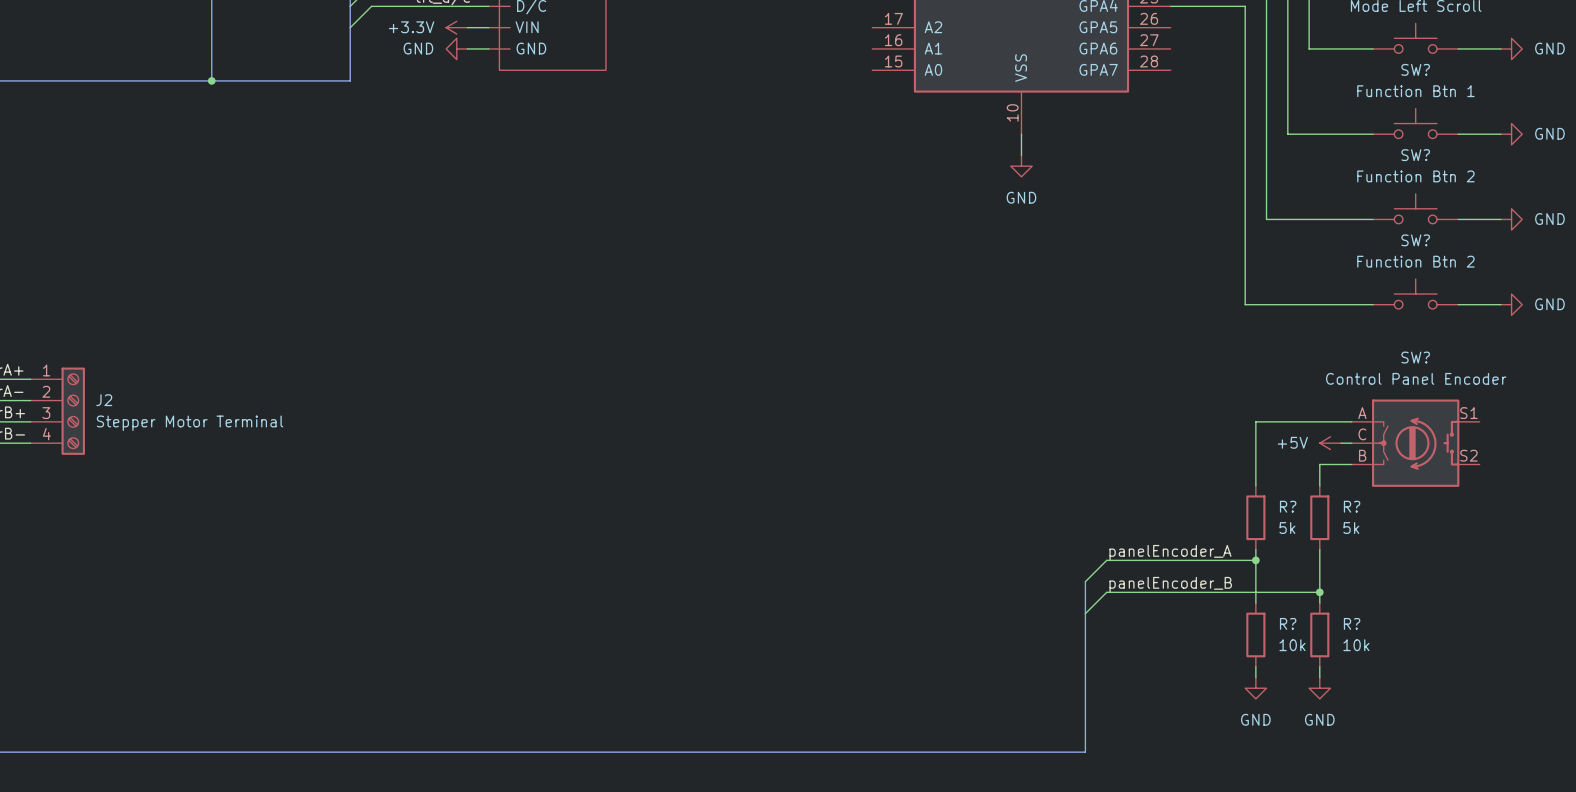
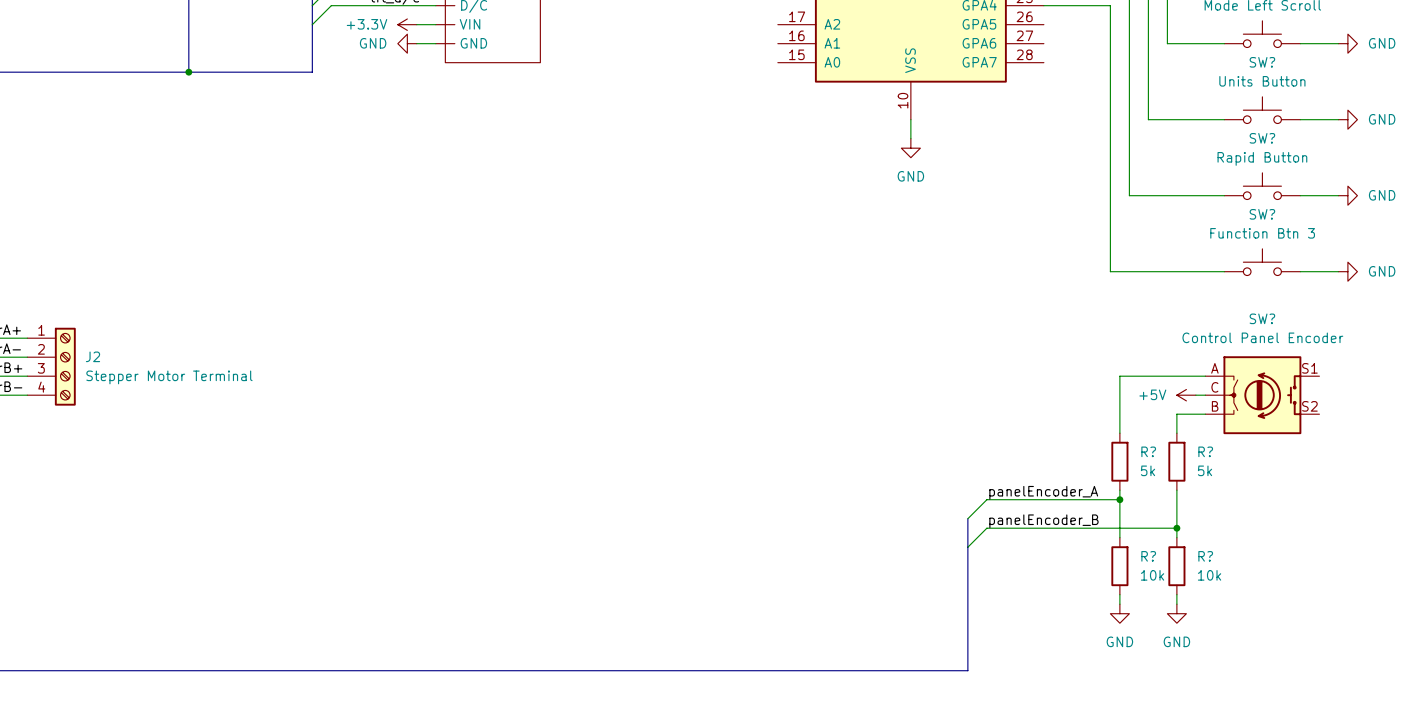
SW? value: Function Btn 1 (1415, 91) -> Units Button (1262, 81)
SW? value: Function Btn 2 (1415, 176) -> Rapid Button (1262, 158)
SW? value: Function Btn 2 (1415, 261) -> Function Btn 3 (1262, 233)

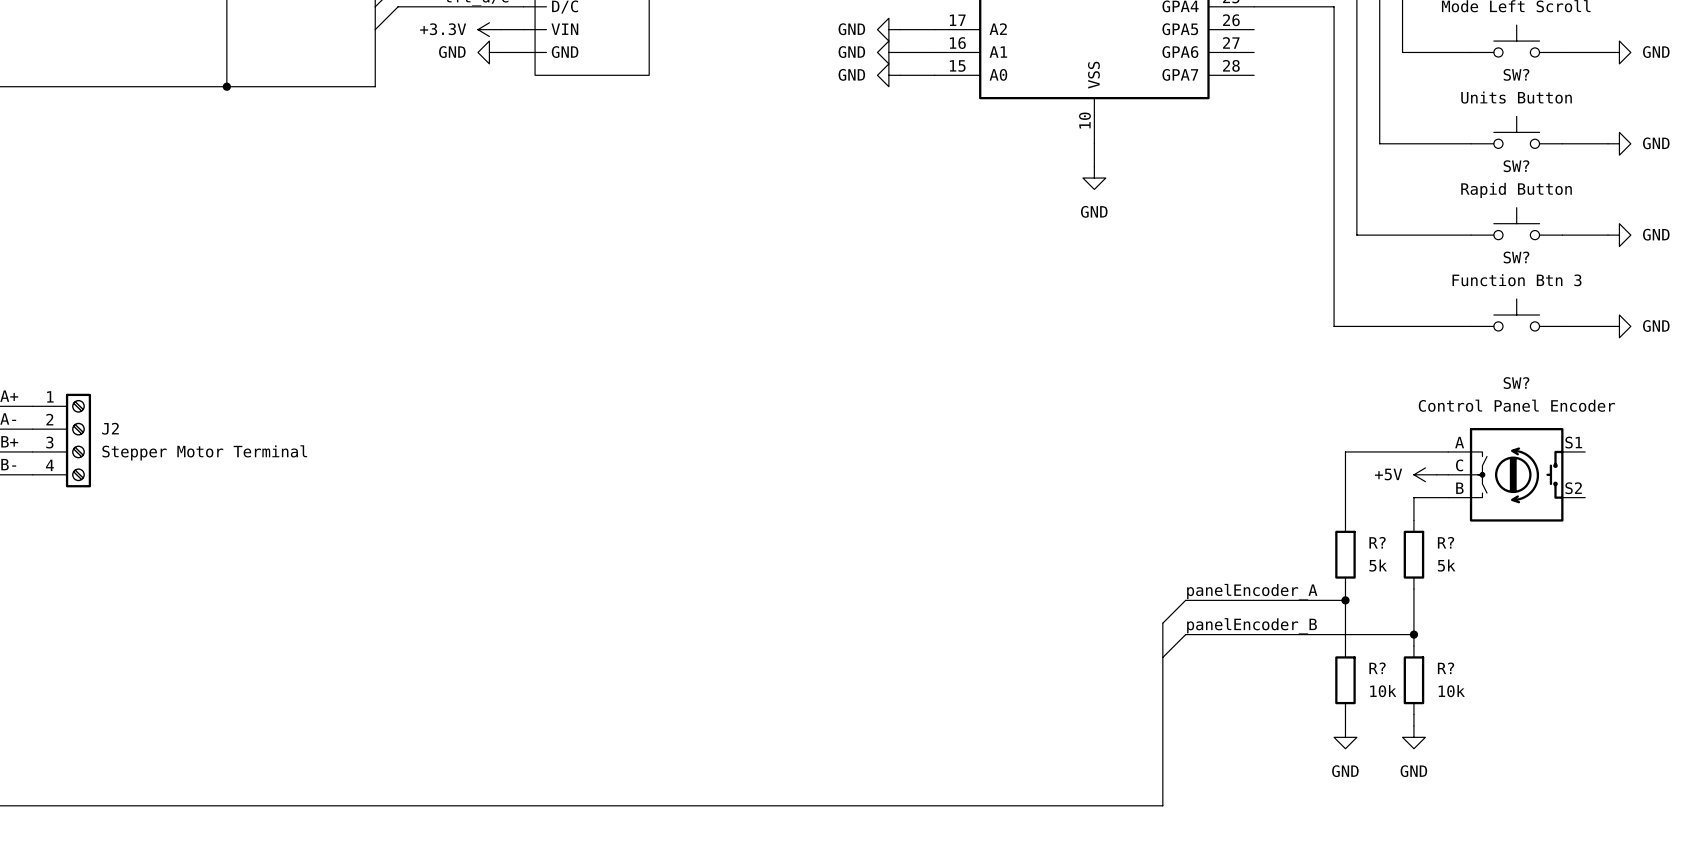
power symbol: none -> GND (888, 29)
wire: none -> (900, 29) (934, 29)
power symbol: none -> GND (888, 52)
wire: none -> (900, 52) (934, 52)
power symbol: none -> GND (888, 75)
wire: none -> (900, 75) (934, 75)

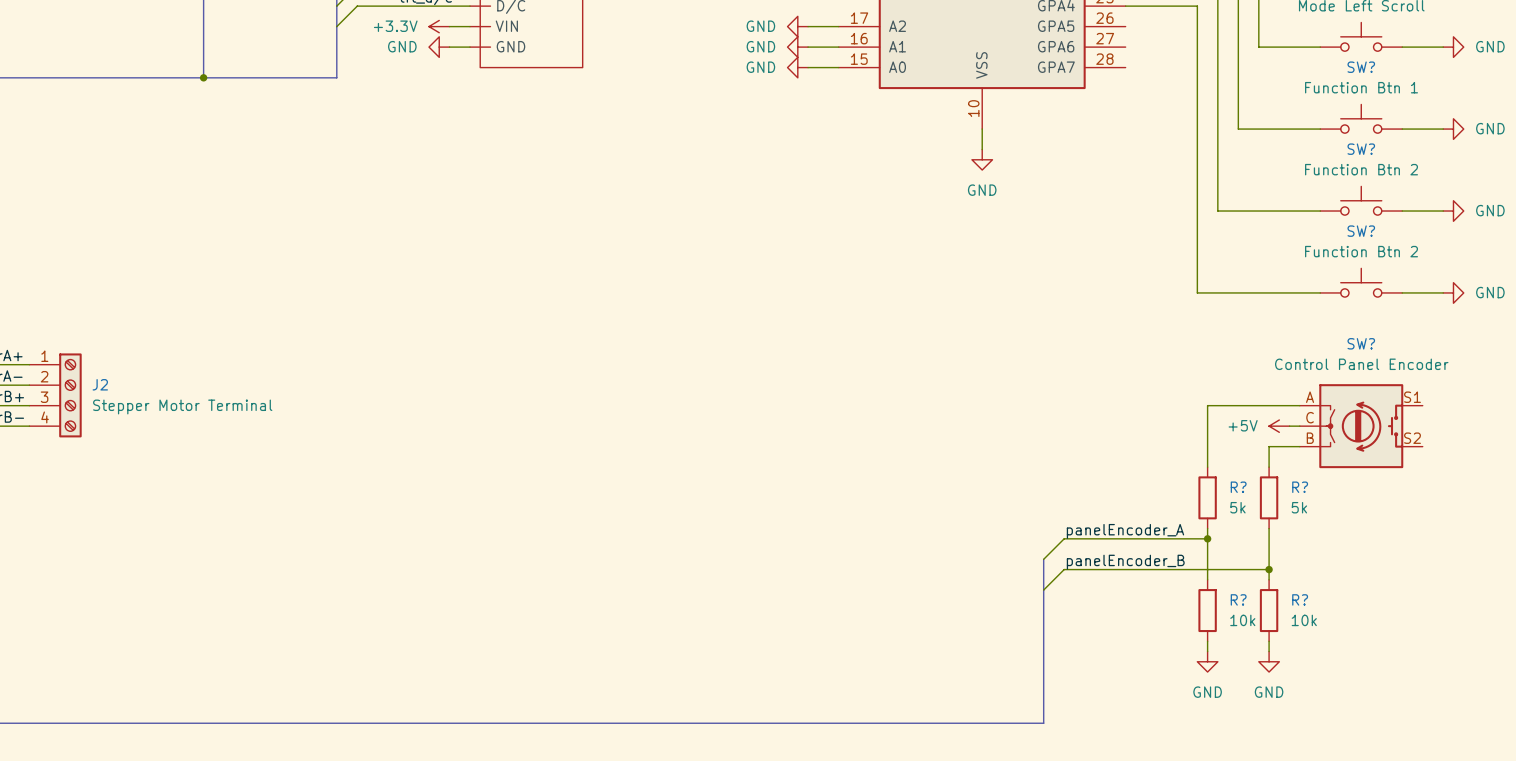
SW? value: Units Button (1516, 97) -> Function Btn 1 (1361, 87)
SW? value: Rapid Button (1516, 190) -> Function Btn 2 (1361, 169)
SW? value: Function Btn 3 (1516, 280) -> Function Btn 2 (1361, 251)

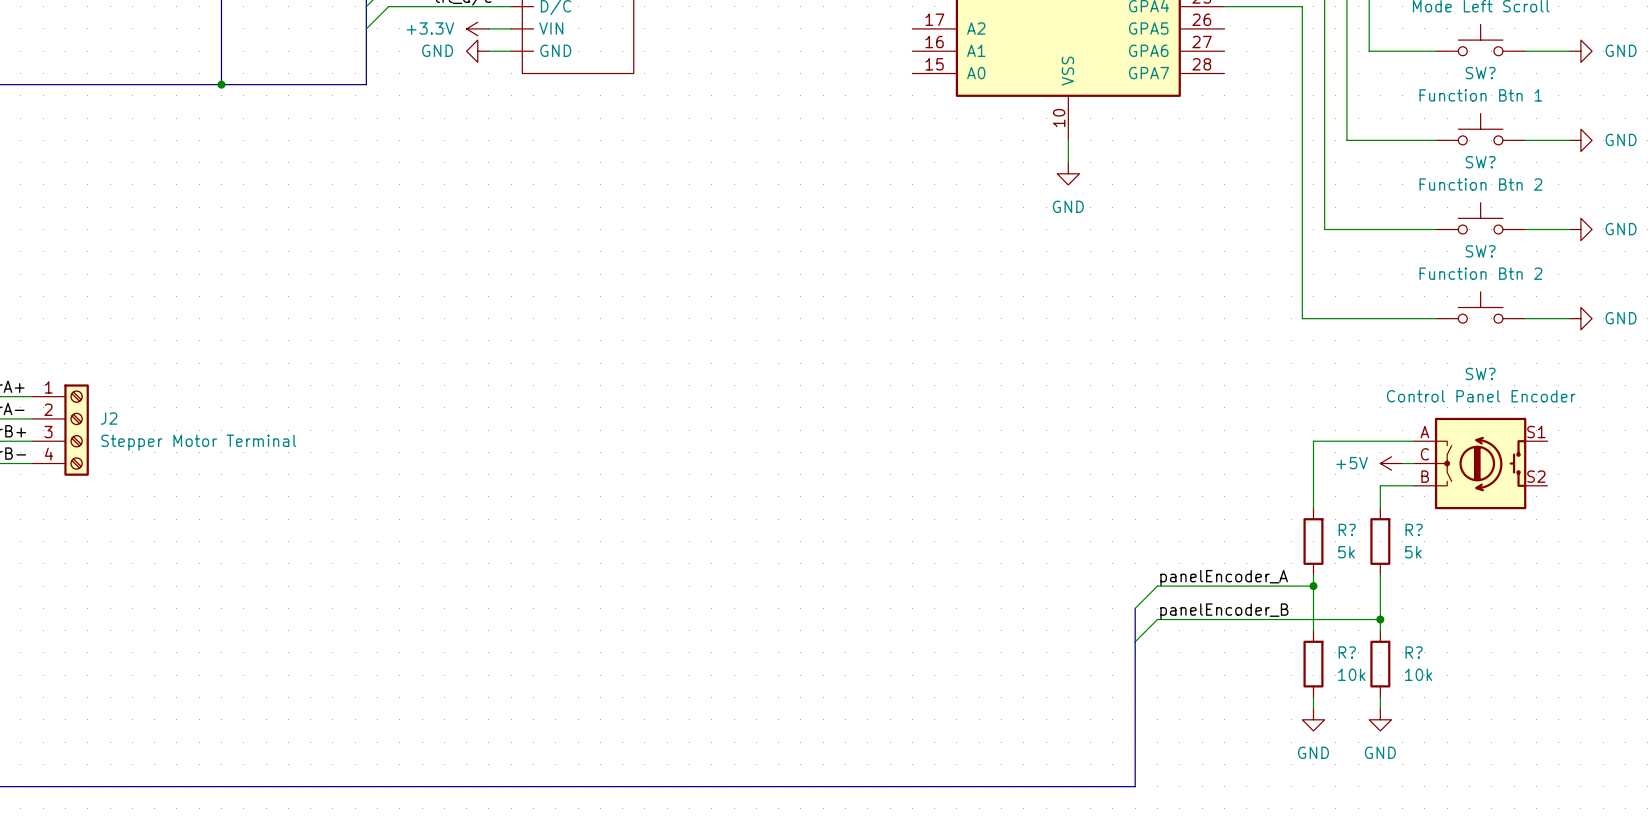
power symbol: GND (797, 26) -> none
wire: (808, 26) (838, 26) -> none
power symbol: GND (797, 47) -> none
wire: (808, 47) (838, 47) -> none
power symbol: GND (797, 67) -> none
wire: (808, 67) (838, 67) -> none

